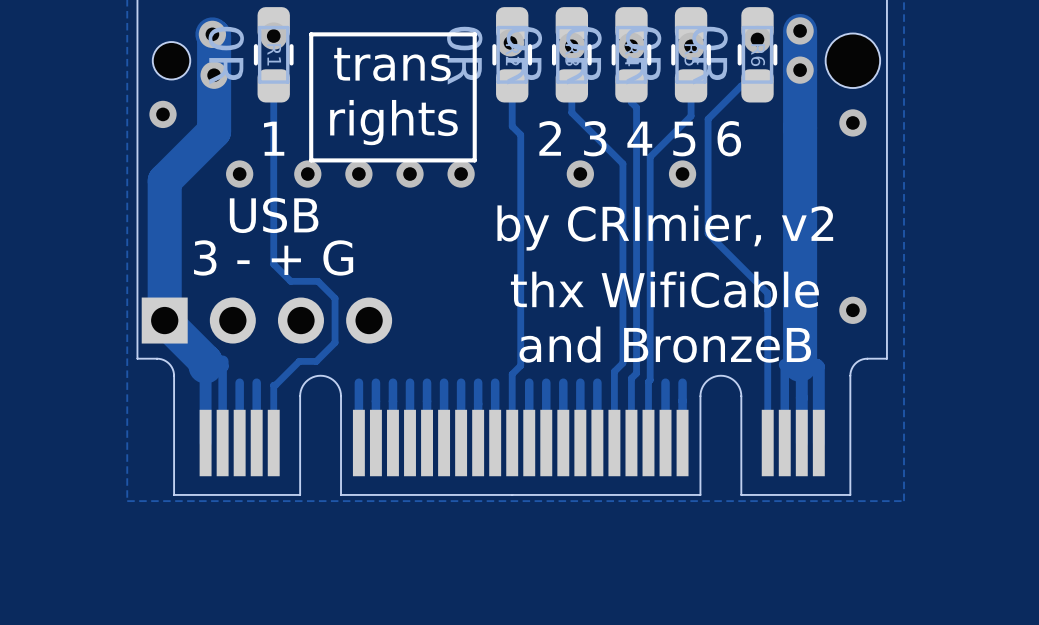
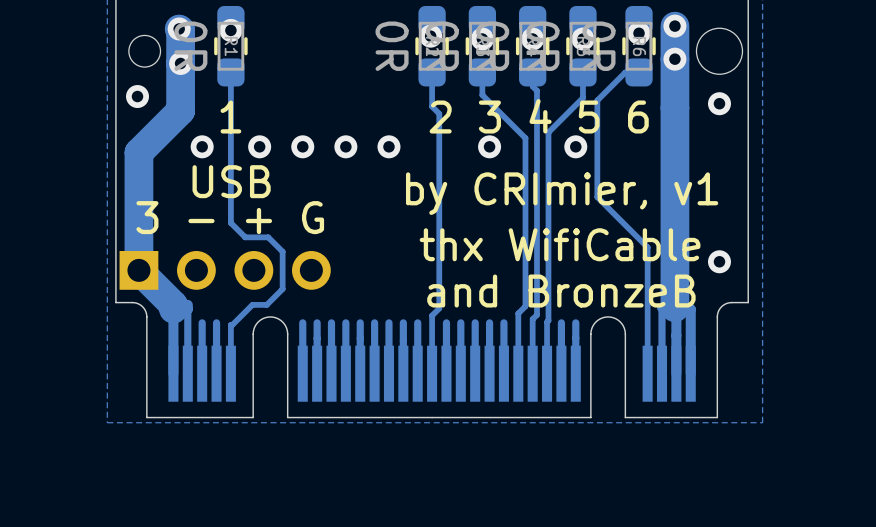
line: (474, 34) (311, 34) (311, 160) (474, 160) (474, 34) -> none
text: trans (392, 64) -> none
text: rights (393, 122) -> none
text: by CRImier, v2 (665, 228) -> by CRImier, v1 (562, 193)

